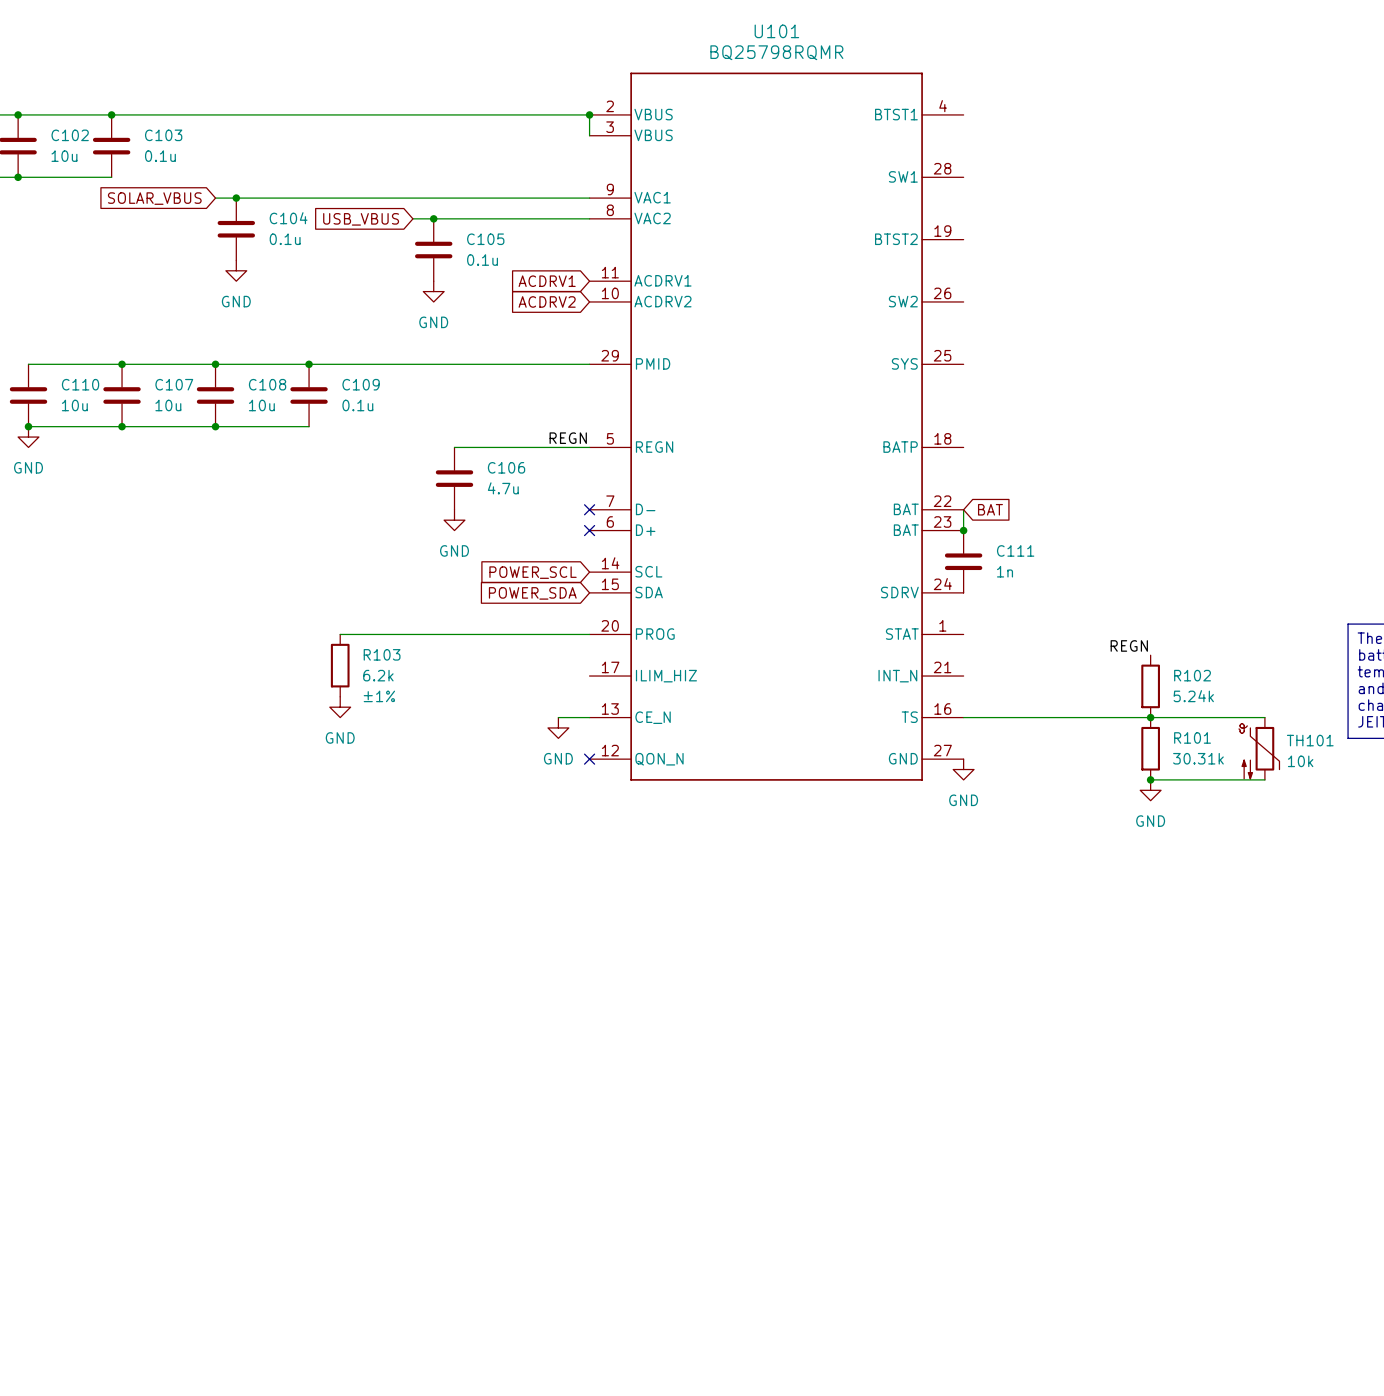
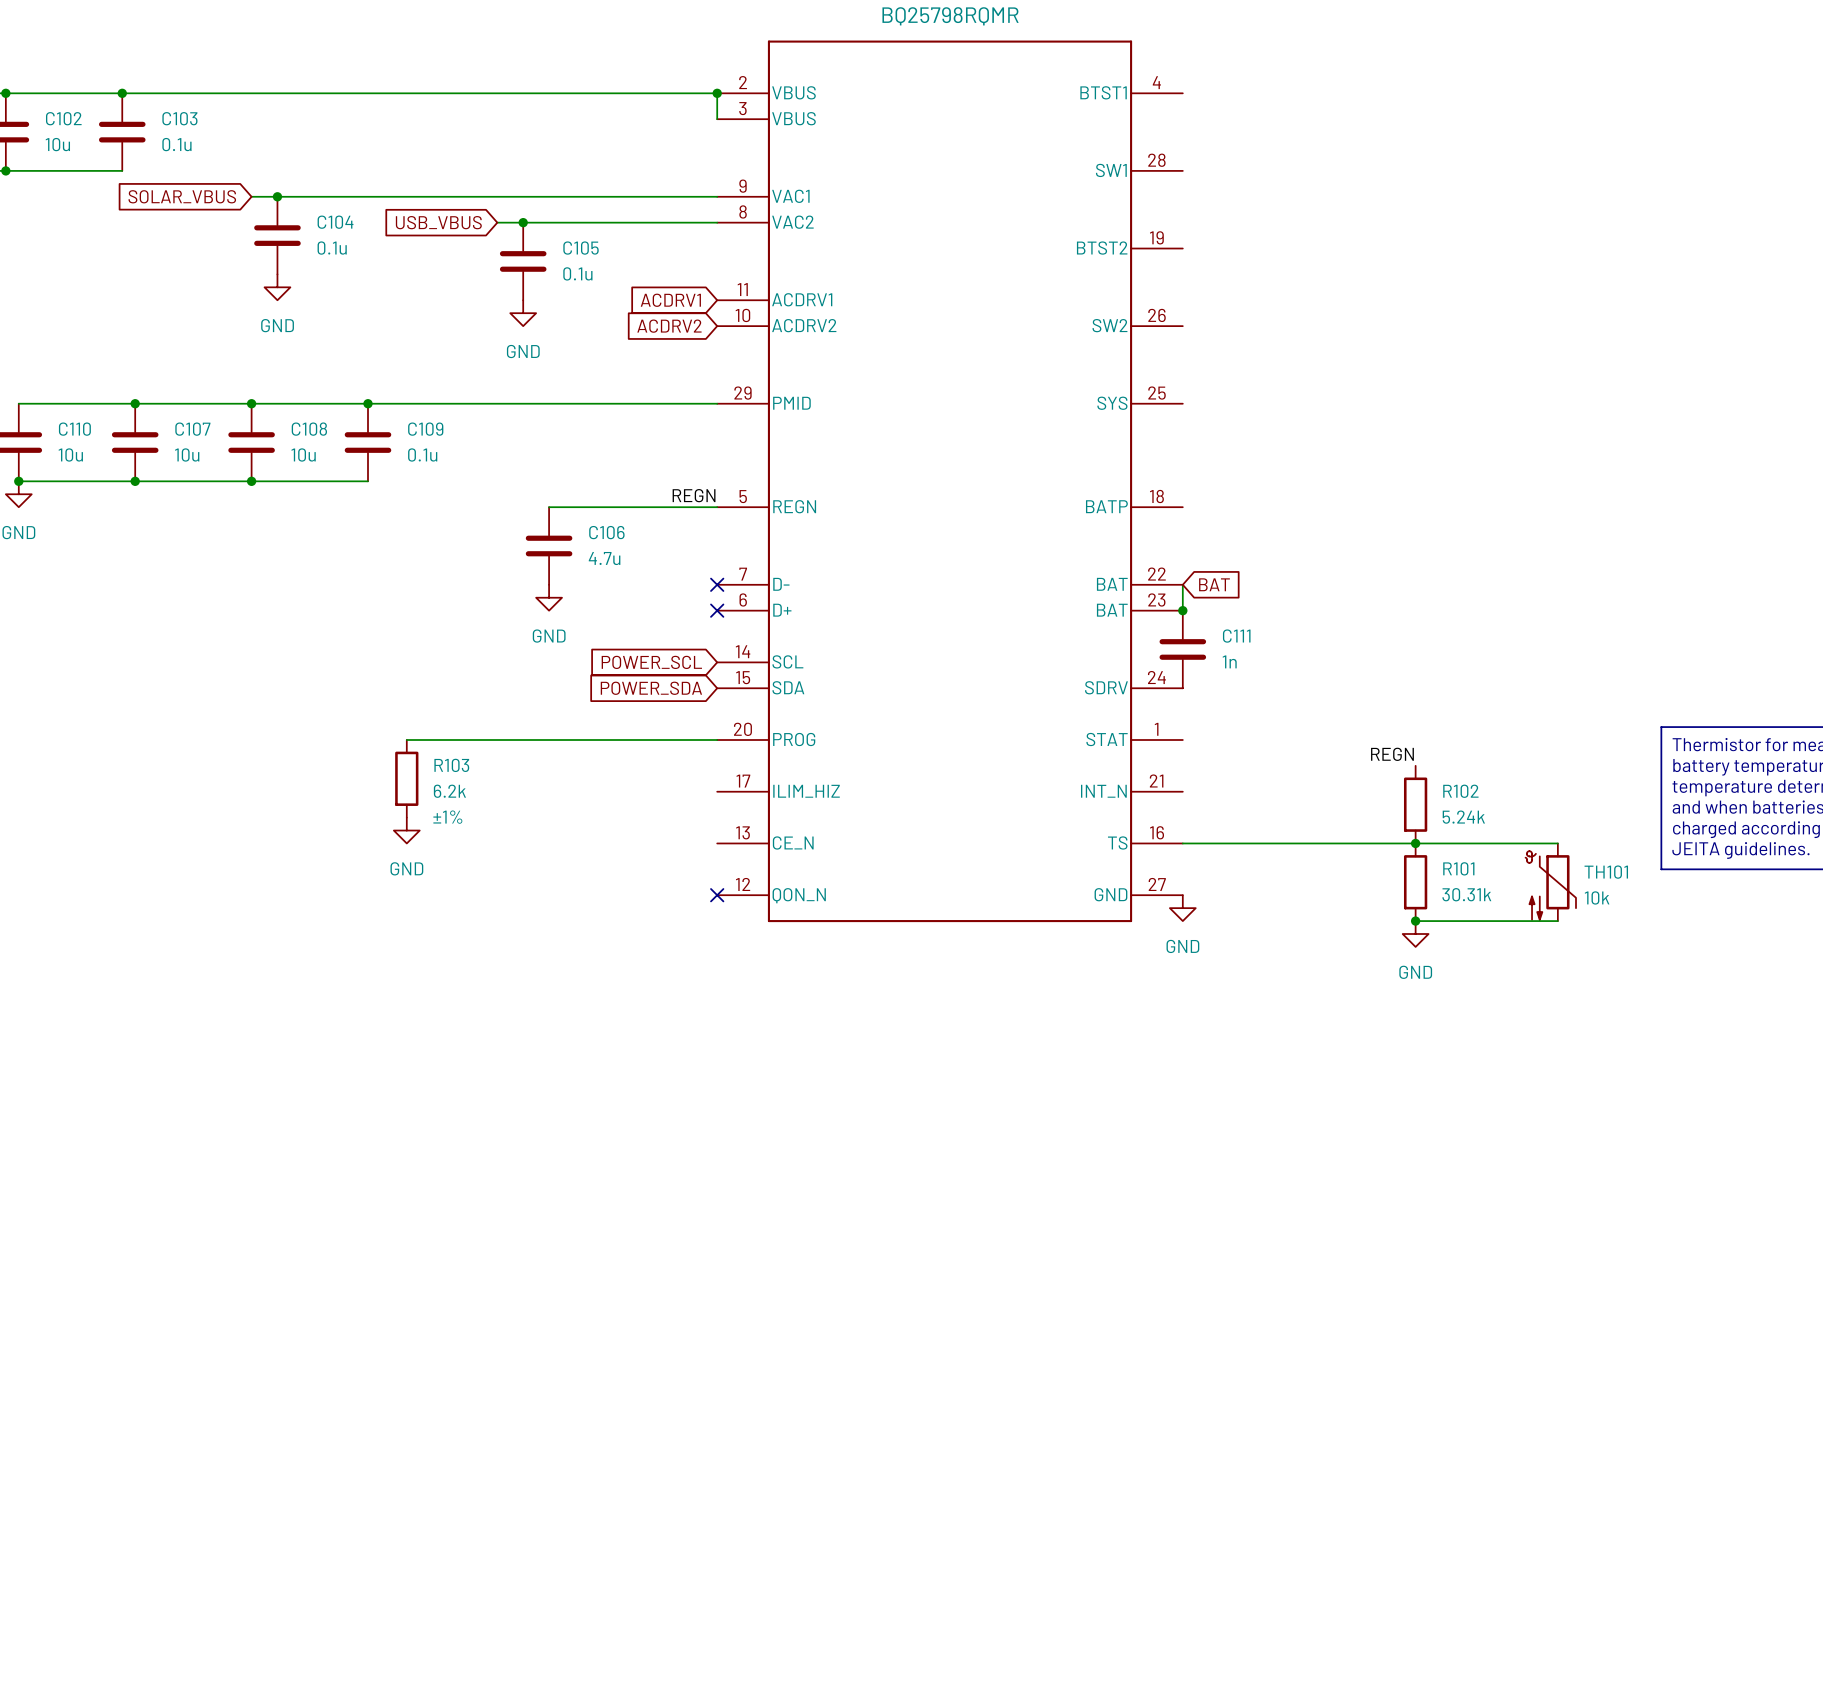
wire: (558, 717) (589, 717) -> none
power symbol: GND (558, 727) -> none

